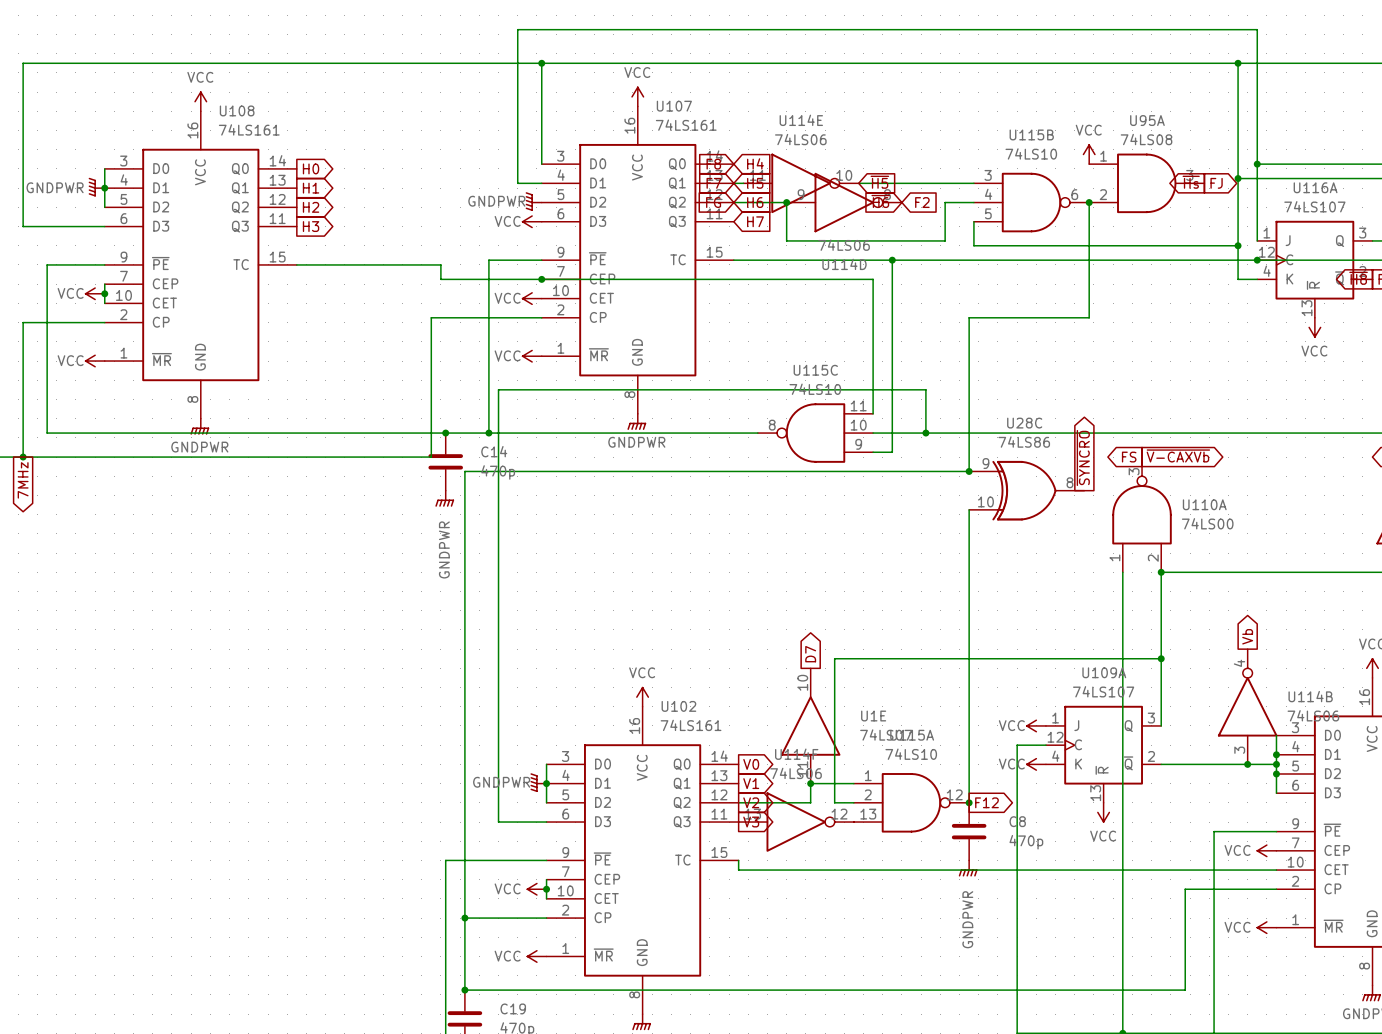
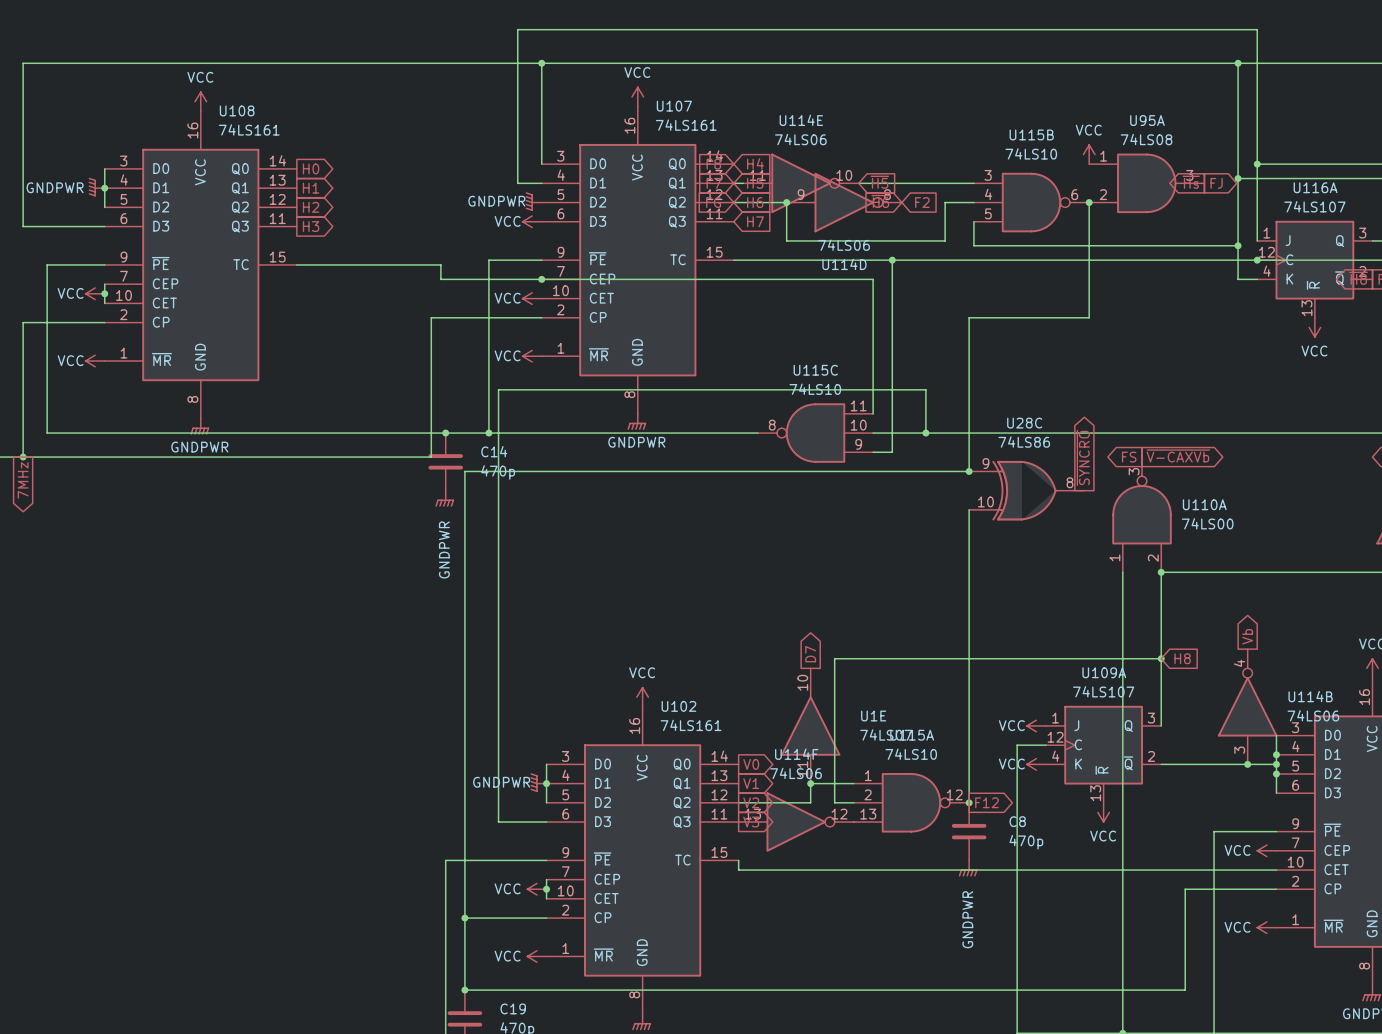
global label: none -> H8 (1182, 658)

